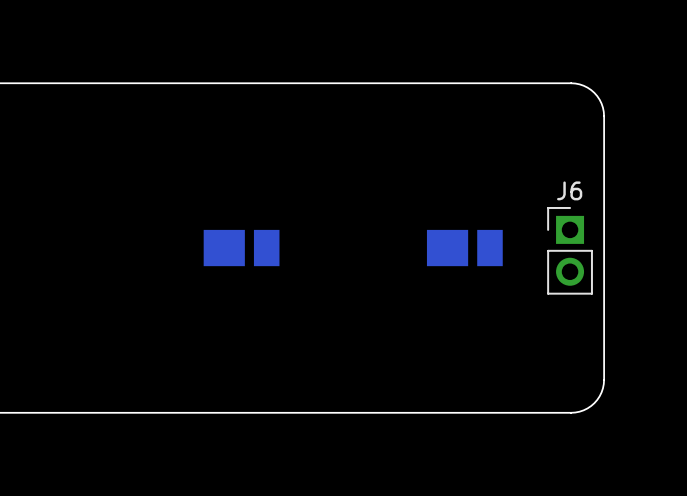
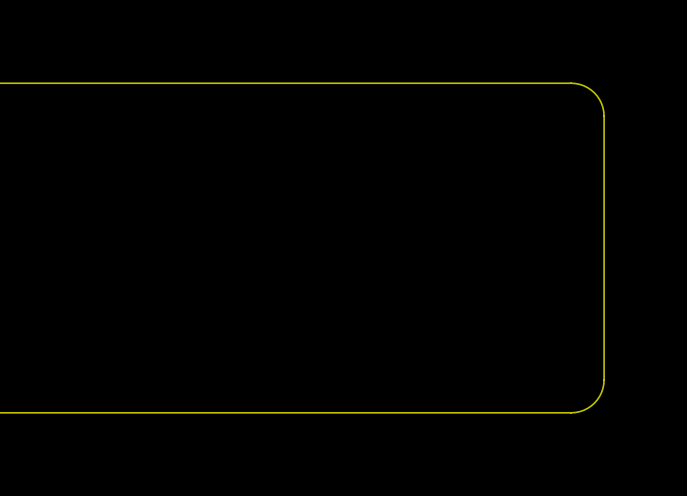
part: (241, 248) -> none
part: (464, 248) -> none
J6: (570, 250) -> none

